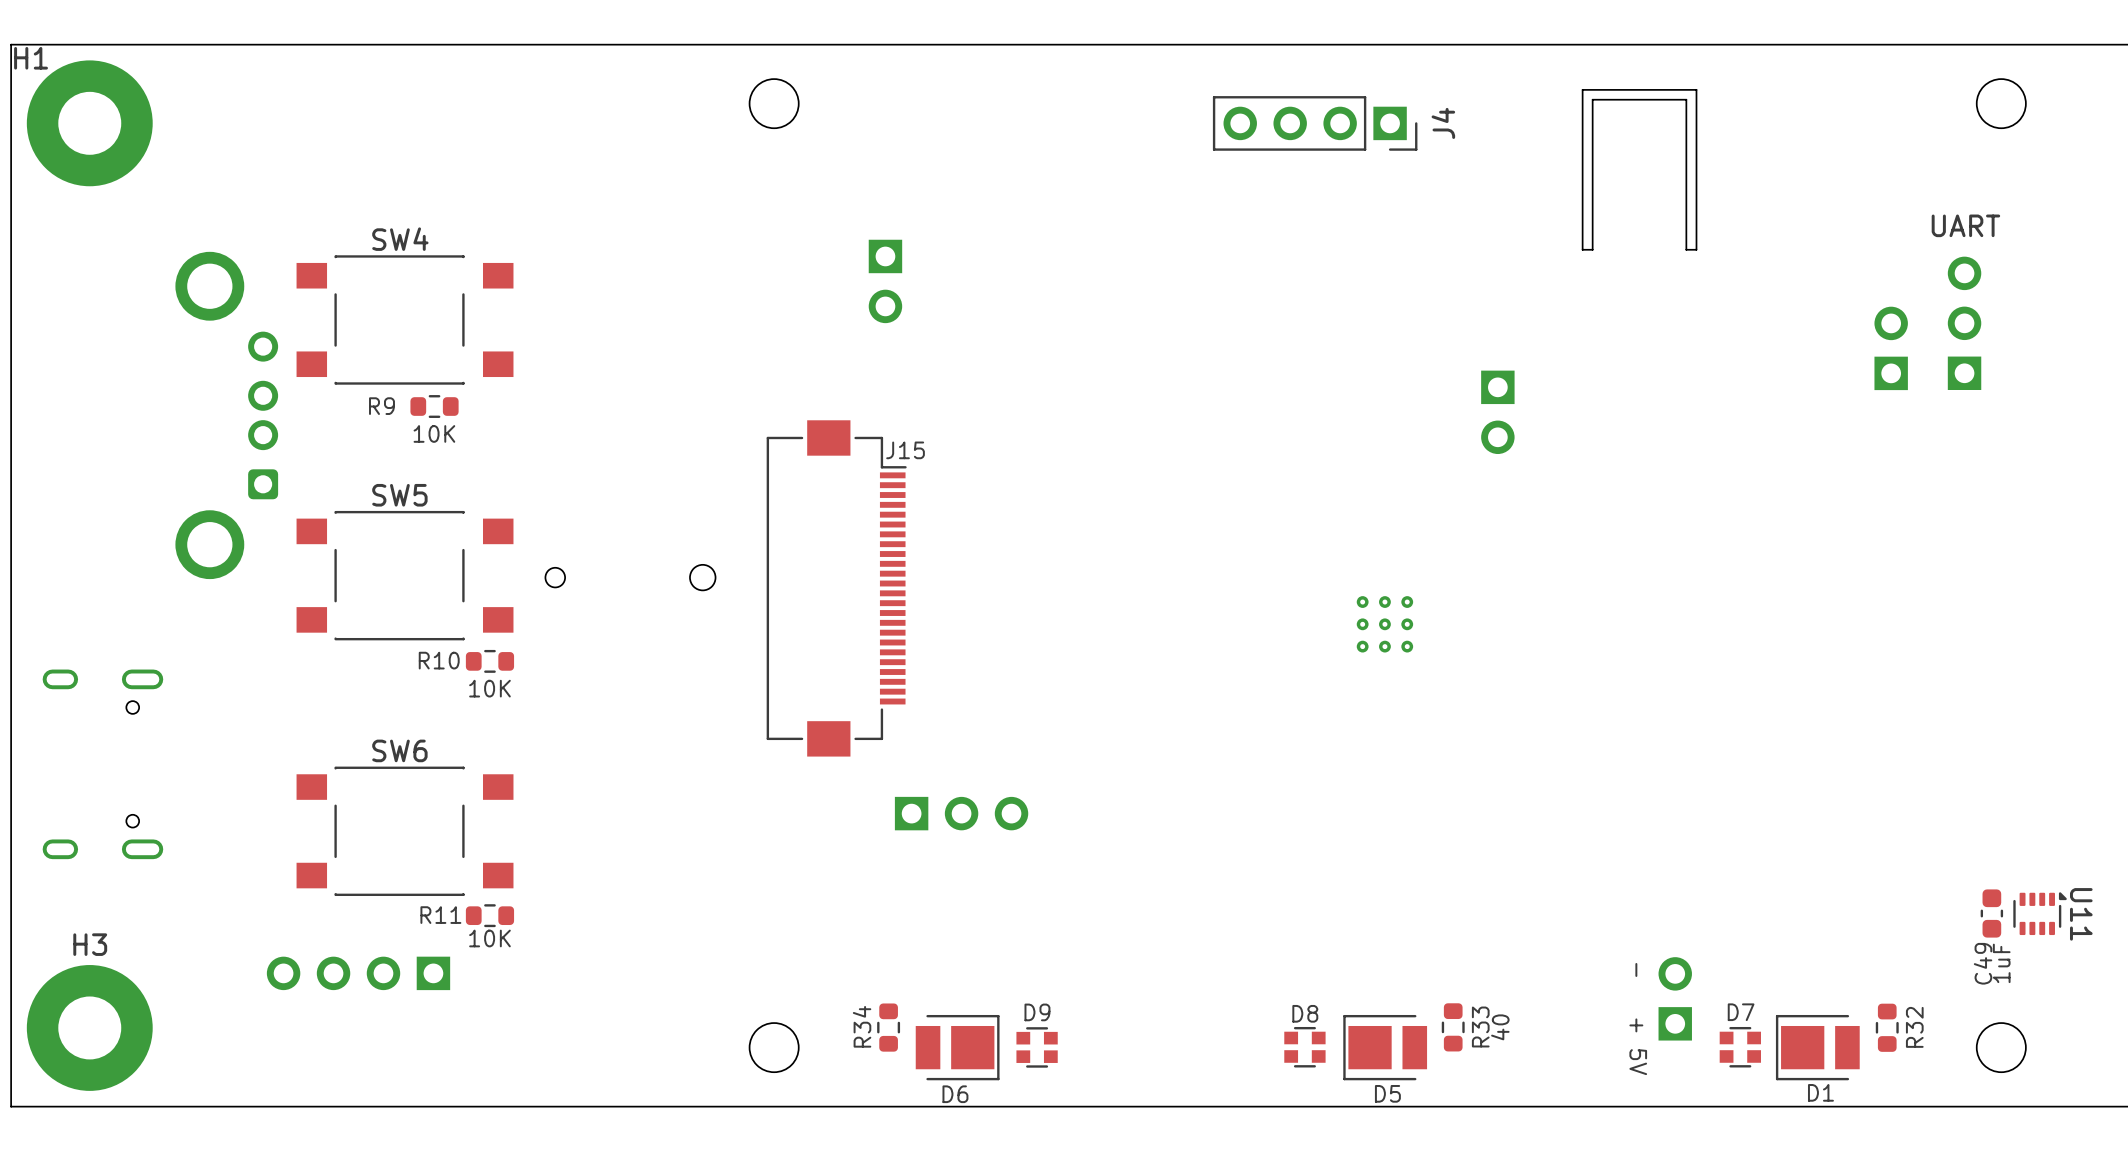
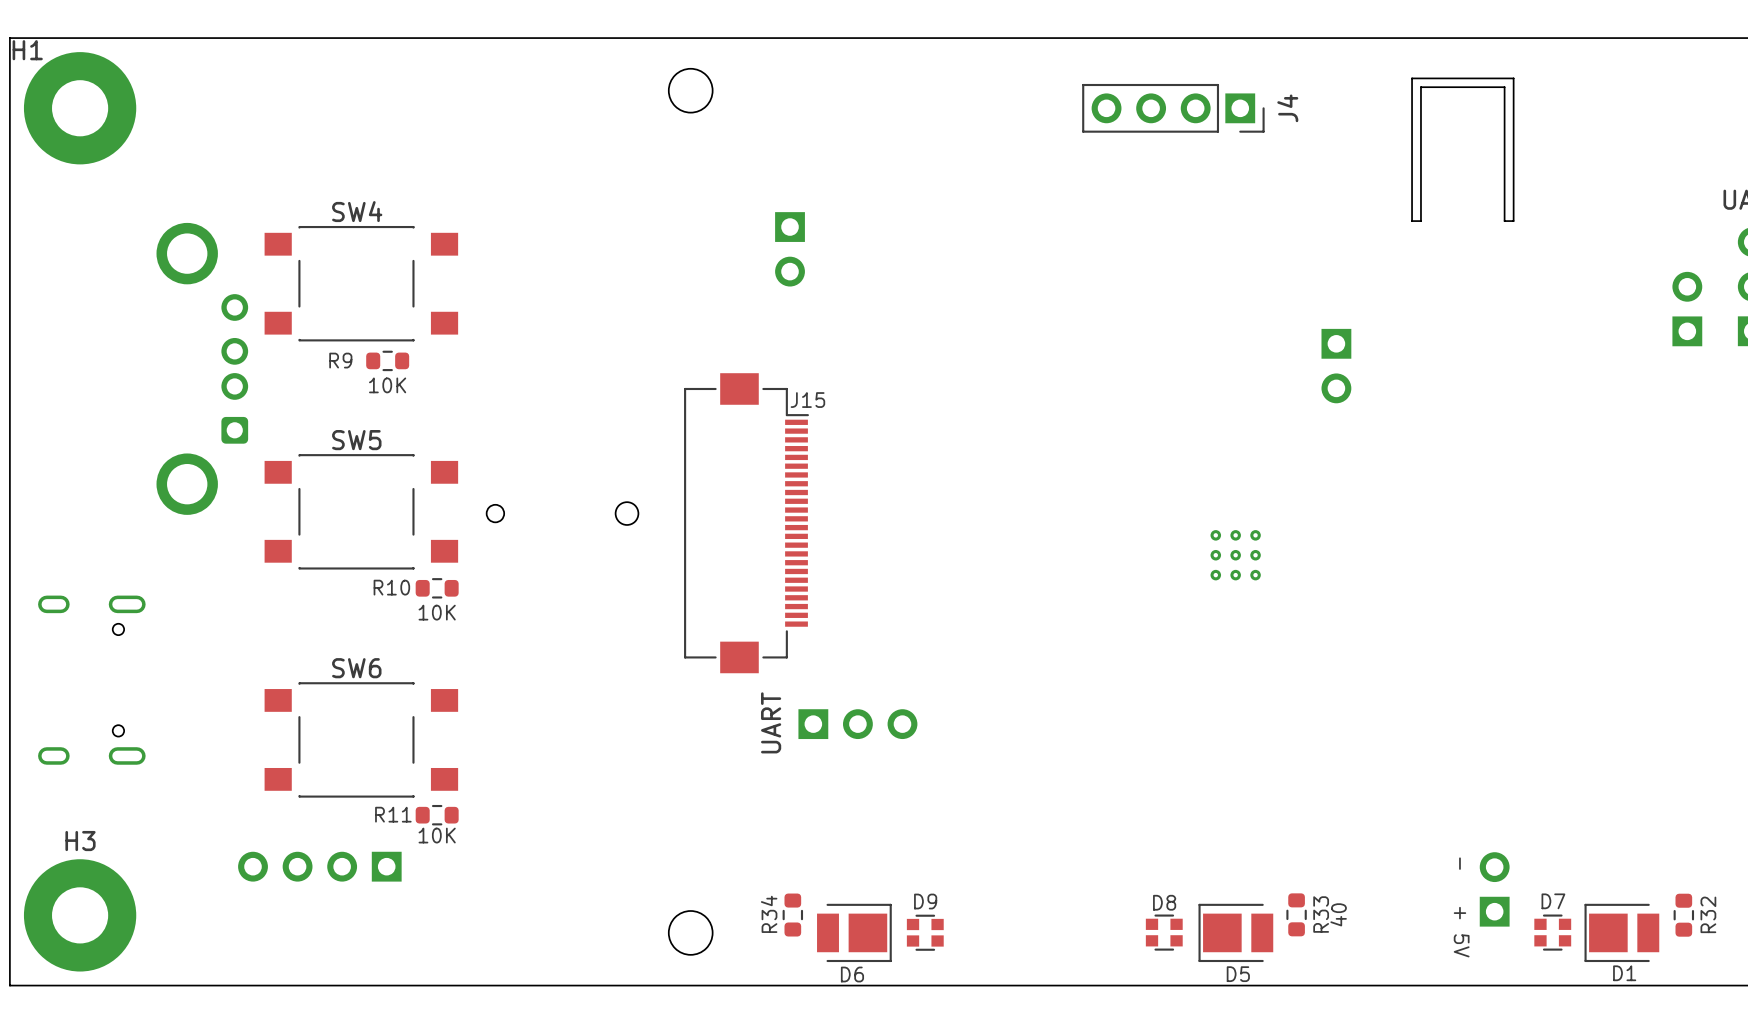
part value: none -> UART (771, 722)

